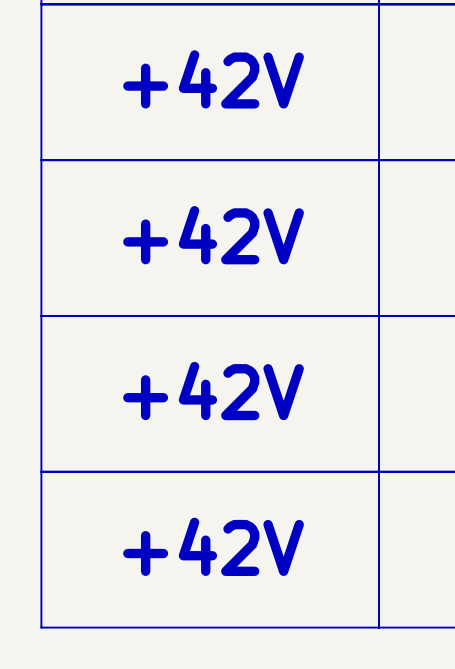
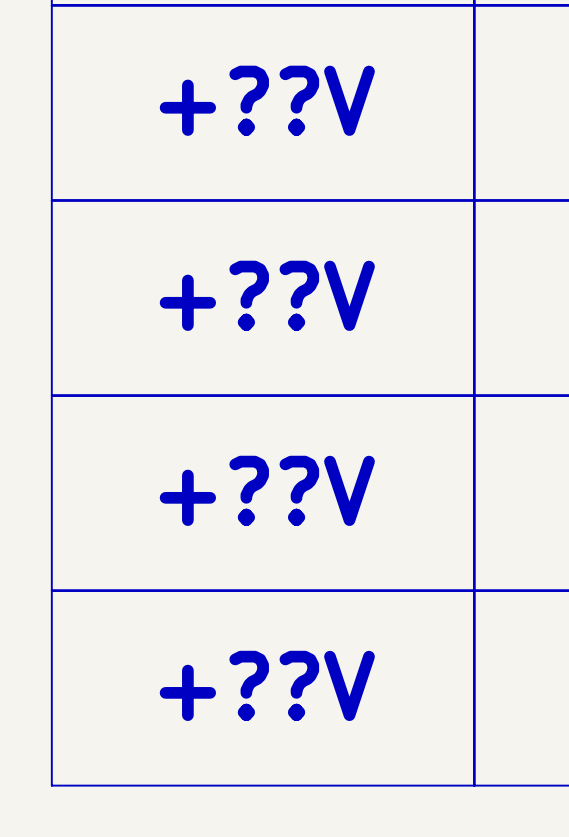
text: +42V (213, 79) -> +??V (267, 100)
text: +42V (213, 235) -> +??V (267, 295)
text: +42V (213, 391) -> +??V (267, 490)
text: +42V (213, 546) -> +??V (267, 685)

